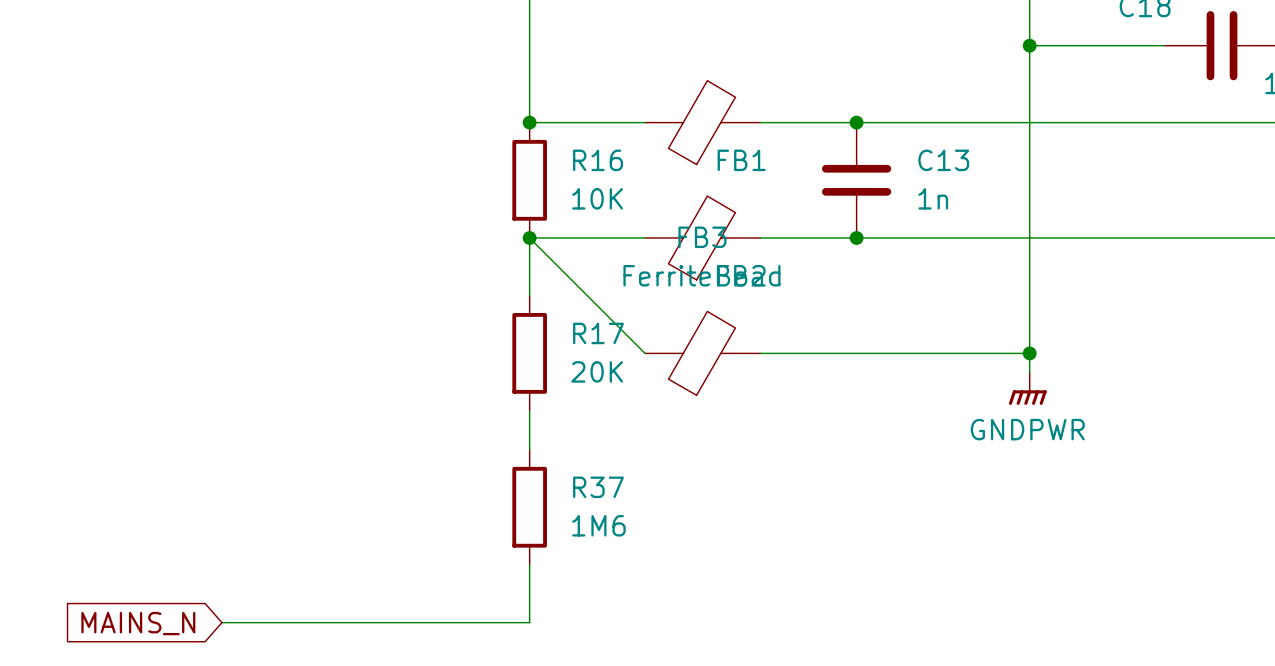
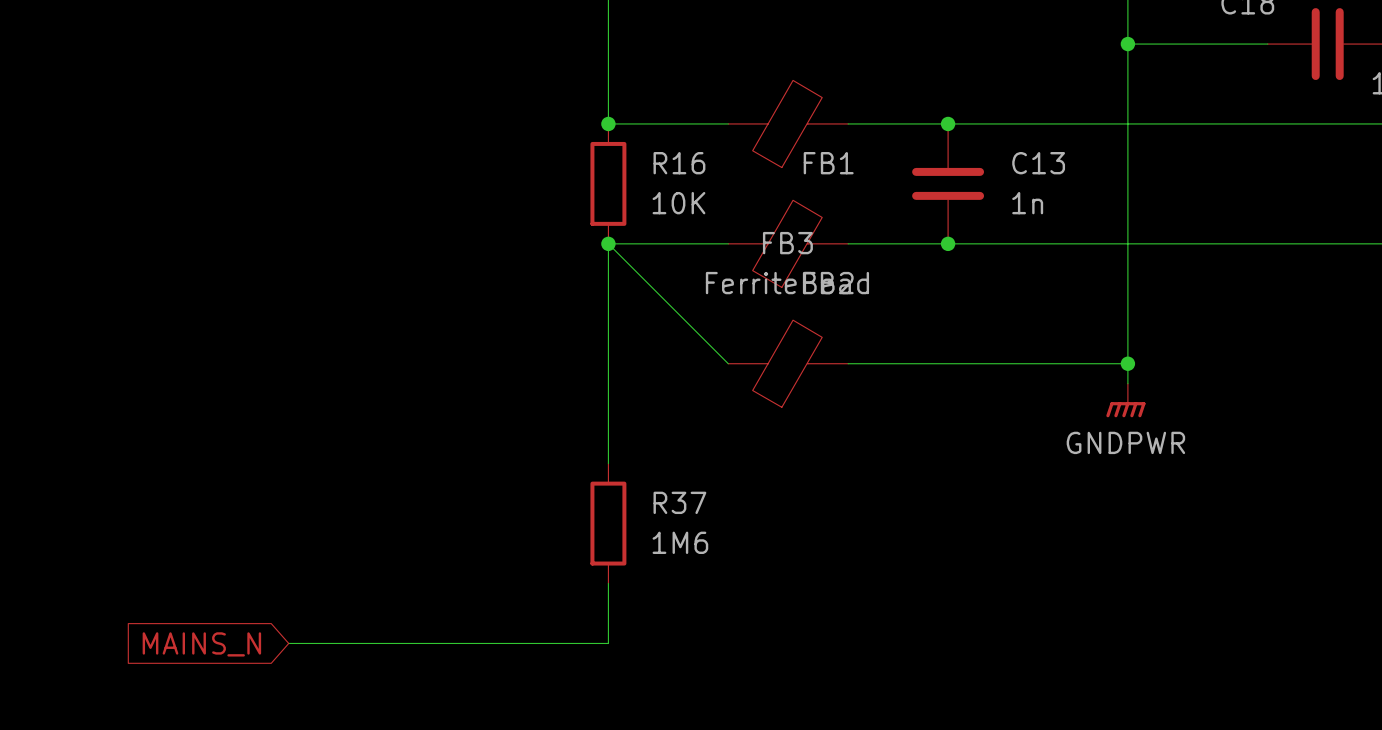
wire: none -> (608, 303) (608, 423)
R17: 20K (529, 353) -> none

